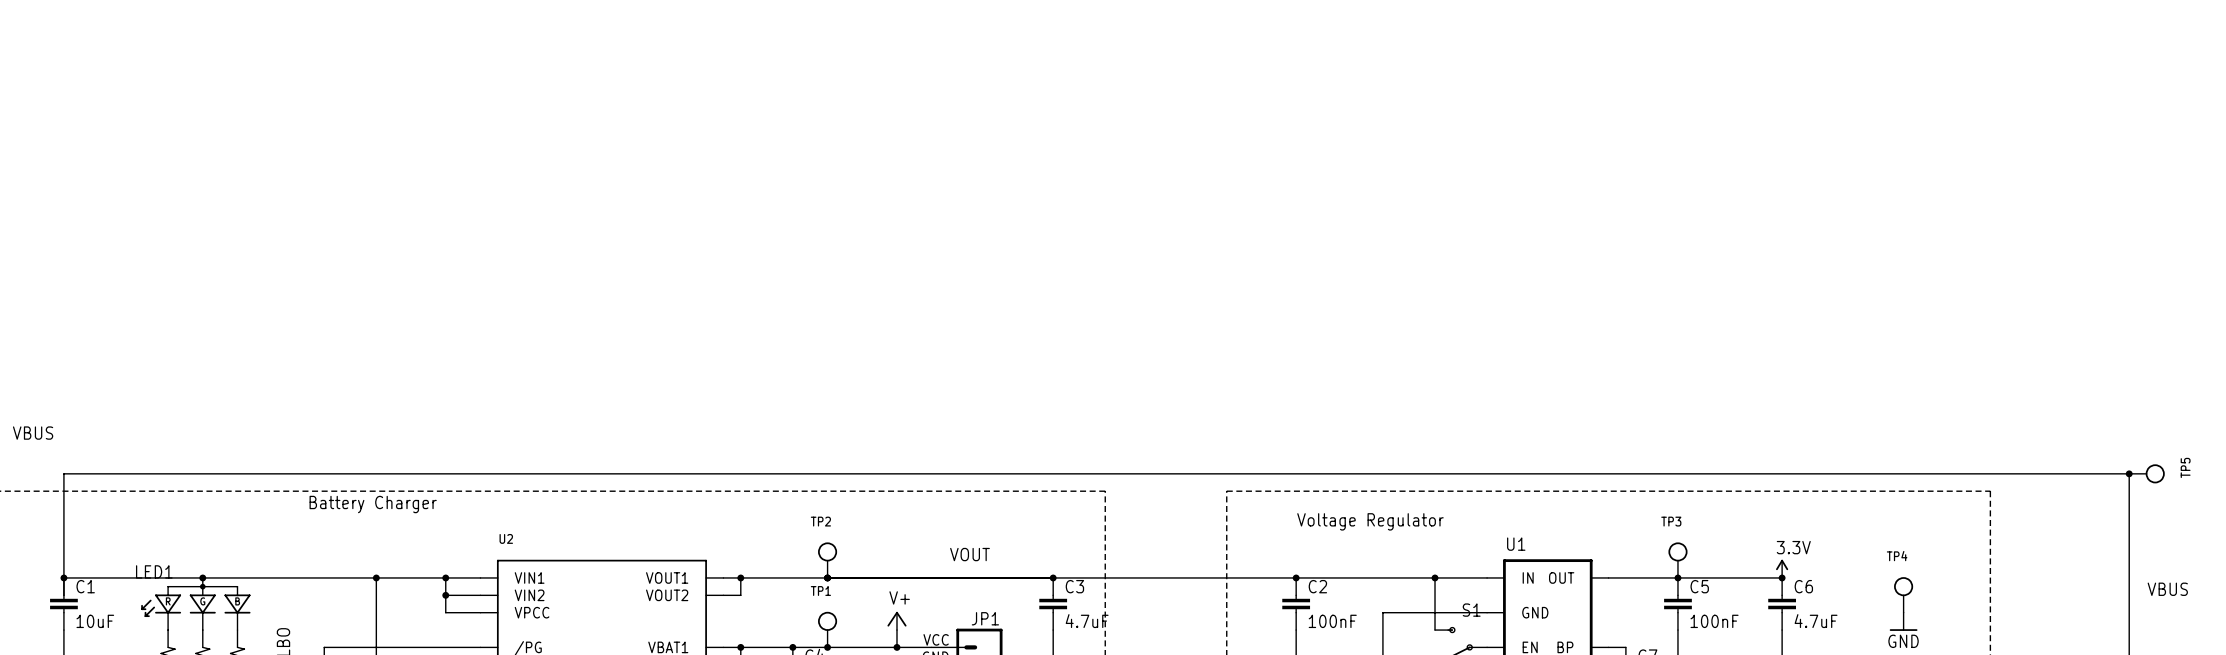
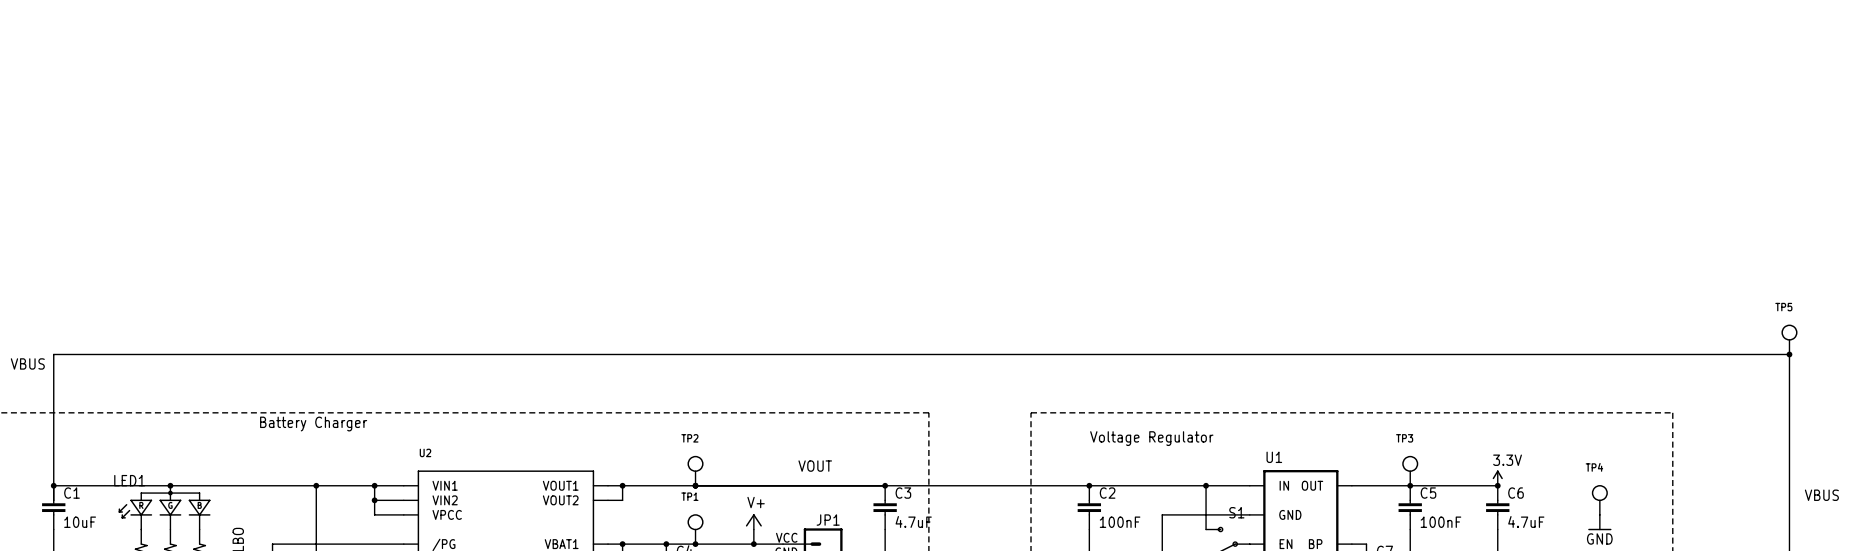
junction: none -> (1789, 354)
wire: (63, 473) (2129, 473) -> (53, 398) (53, 354) (1789, 354) (1789, 398)
junction: (2129, 473) -> none
TP5 position: (2147, 473) -> (1789, 339)
TP5 rotation: 0° (2155, 473) -> 90° counterclockwise (1789, 332)

